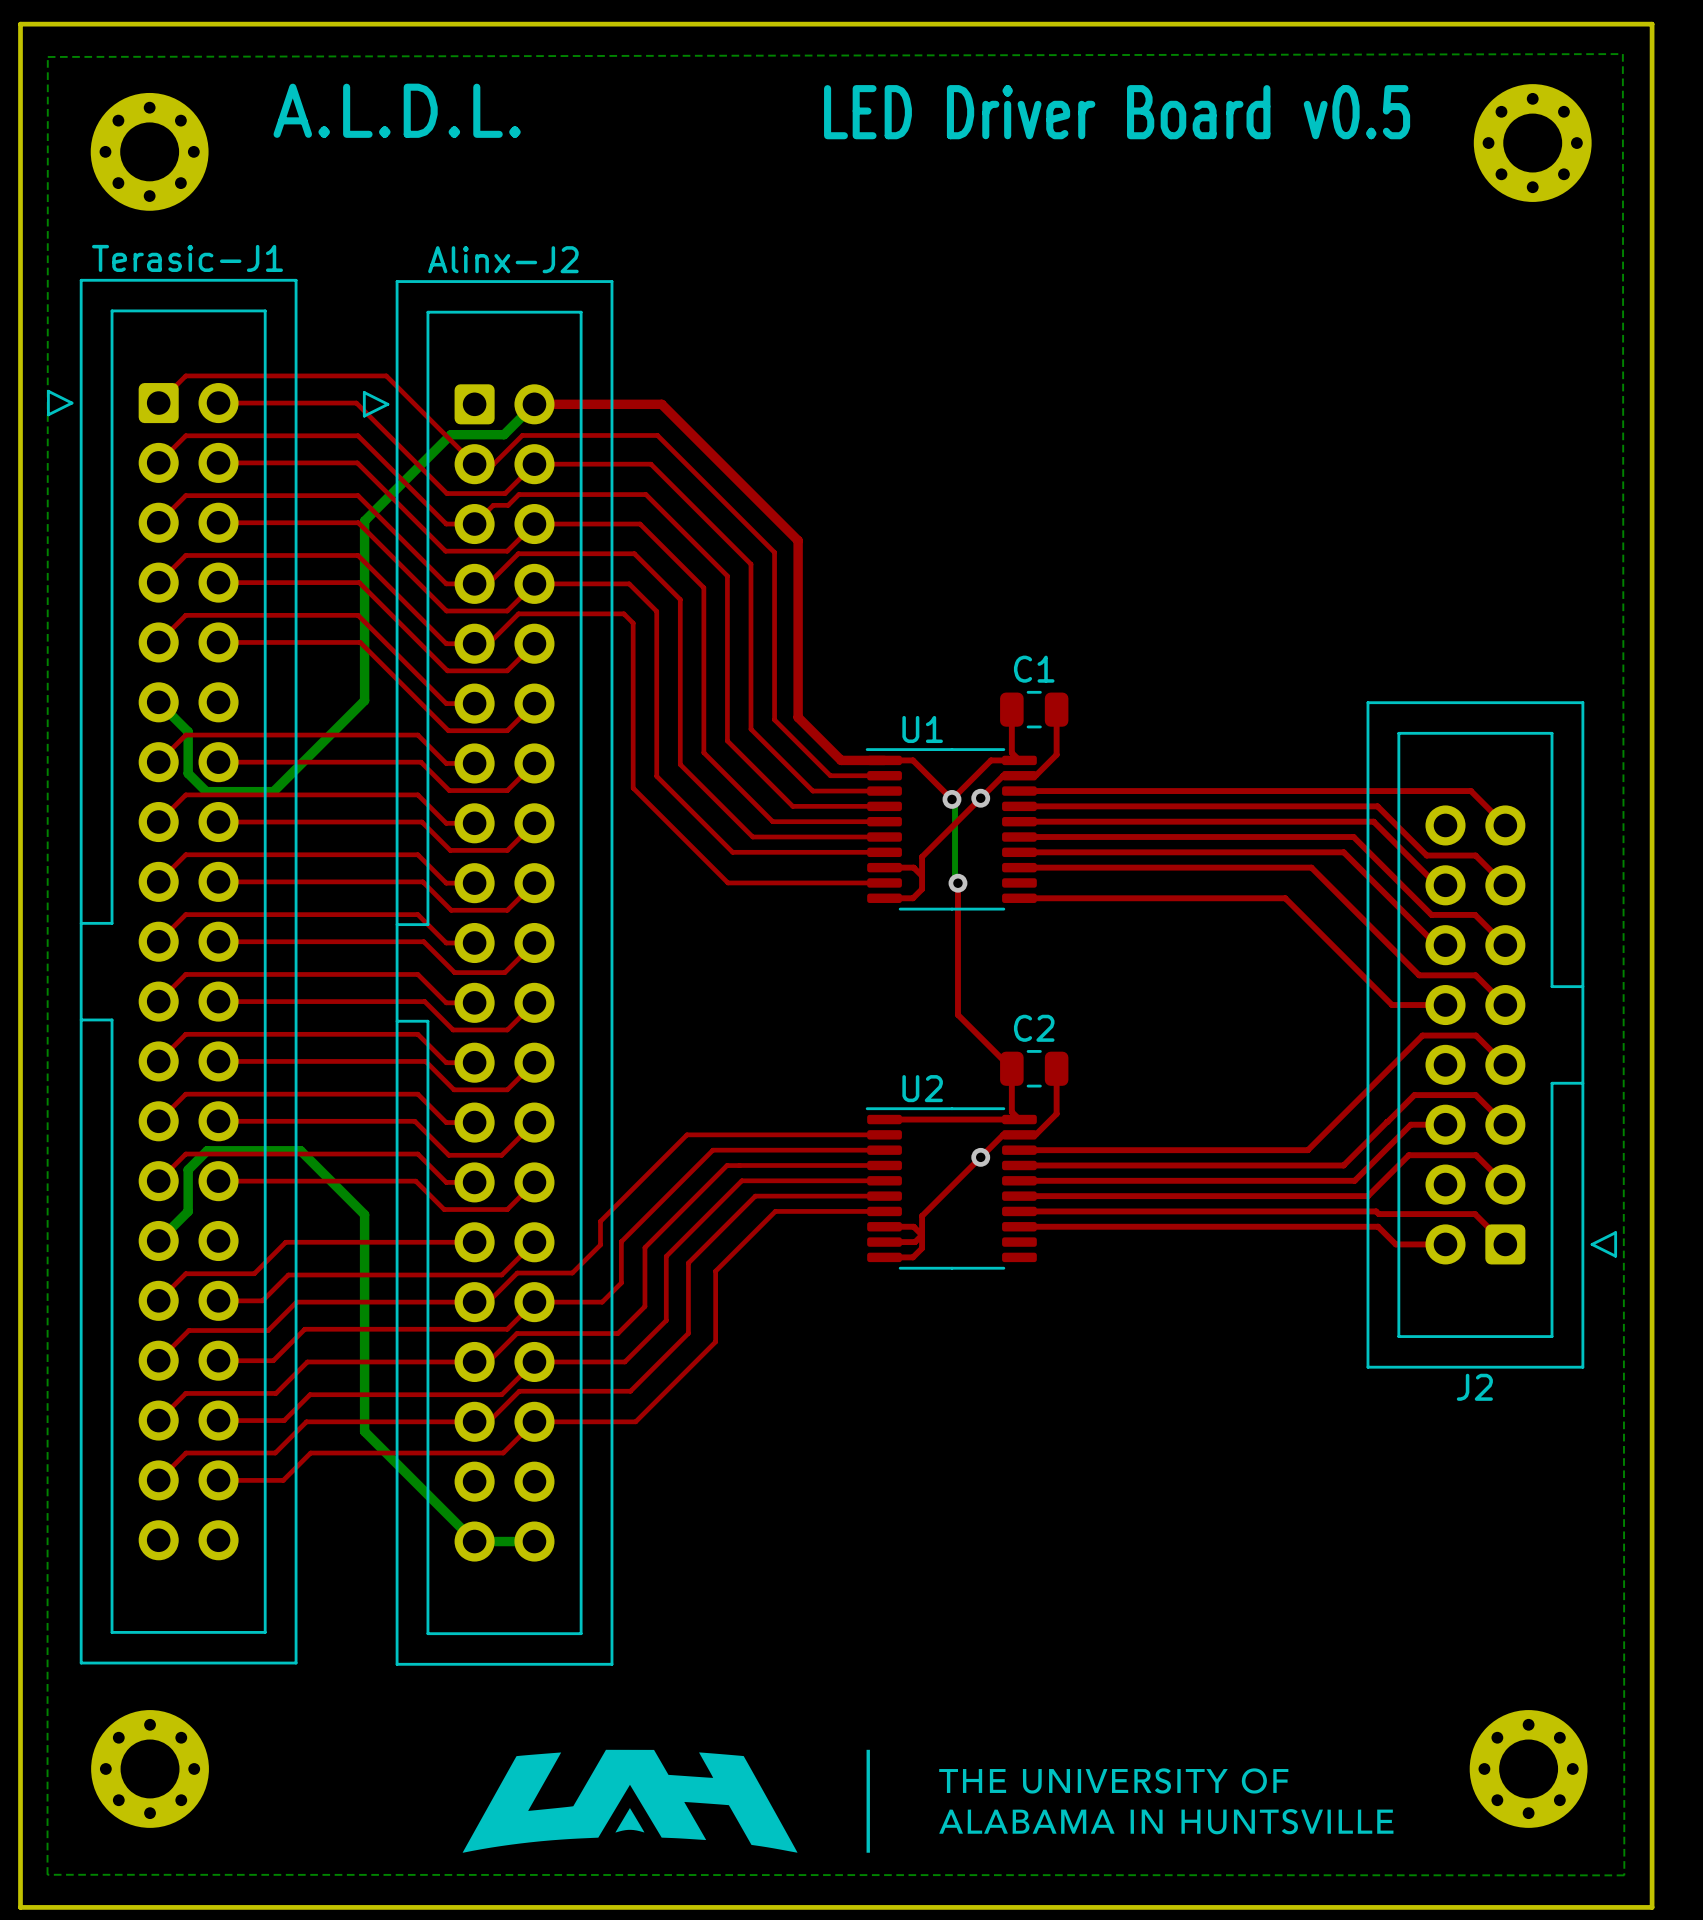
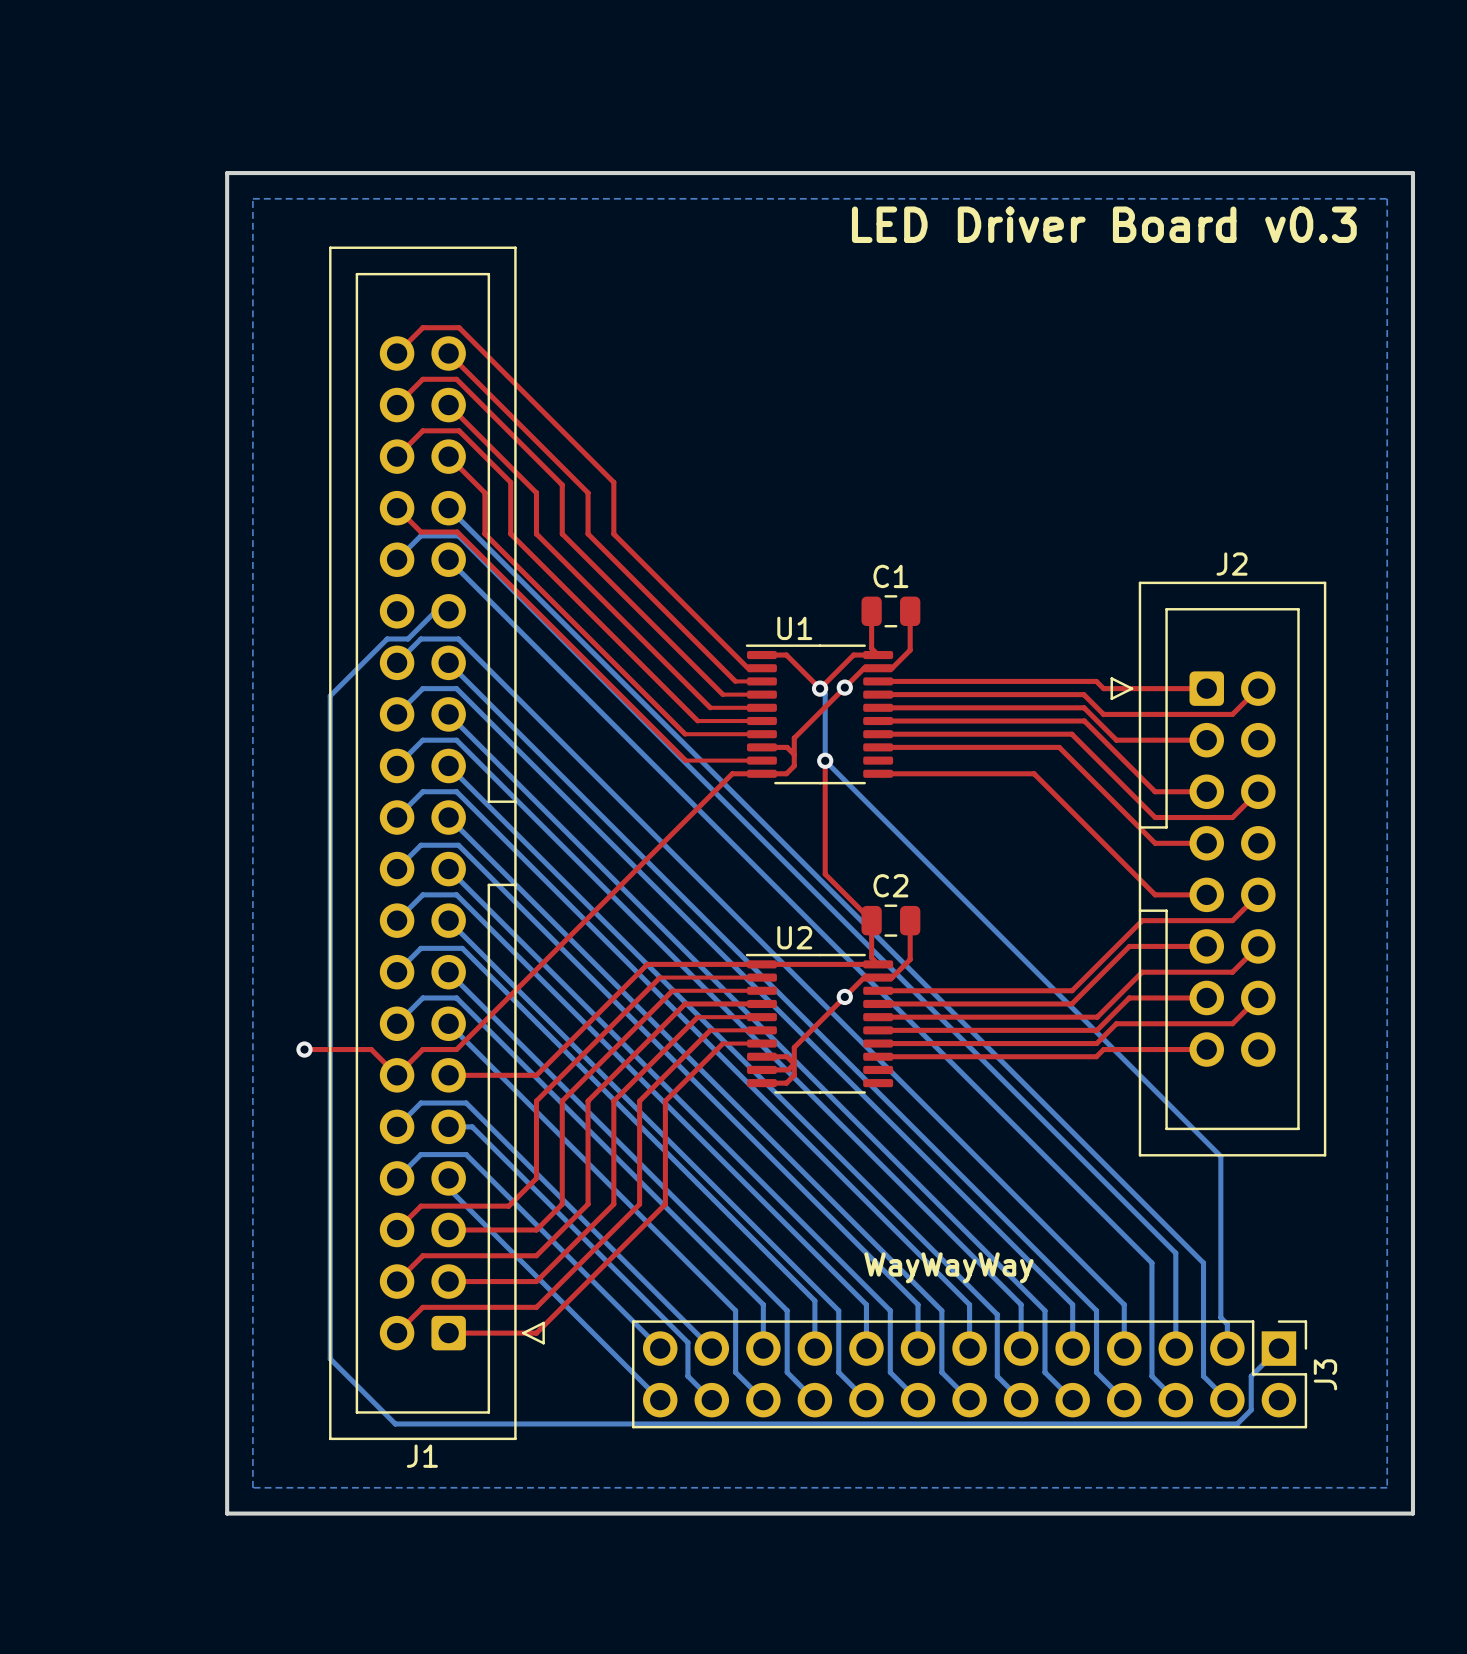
board edge: (20, 24) (1652, 24) (1652, 1907) (20, 1907) (20, 24) -> (227, 173) (227, 1513) (1412, 1513) (1412, 173) (227, 173)
bottom zone outline: (1622, 54) (47, 56) (47, 1874) (1624, 1875) (1622, 54) -> (252, 198) (252, 1487) (1387, 1487) (1387, 198) (252, 198)
text: A.L.D.L. (397, 110) -> none
text: LED Driver Board v0.5 (1117, 112) -> none
part: (1532, 143) -> none
part: (149, 151) -> none
text: none -> LED Driver Board v0.3 (1104, 224)
top track: (158, 403) (185, 375) (386, 375) (474, 464) (493, 464) (522, 435) (657, 435) (774, 552) (774, 719) (830, 775) (868, 775) -> (397, 353) (422, 327) (459, 327) (613, 482) (613, 534) (747, 668)
top track: (218, 403) (356, 403) (446, 493) (505, 493) (534, 464) (650, 464) (750, 564) (750, 729) (812, 791) (853, 791) -> (448, 353) (588, 492) (588, 533) (735, 681)
top track: (534, 404) (661, 404) (798, 540) (798, 717) (841, 760) (884, 760) -> none
bottom track: (534, 404) (504, 434) (450, 434) (364, 521) (364, 700) (273, 791) (206, 791) (188, 773) (188, 731) (158, 702) -> none
top track: (158, 462) (185, 435) (358, 435) (446, 524) (474, 524) (493, 505) (508, 505) (518, 494) (645, 494) (727, 576) (727, 740) (792, 806) (839, 806) -> (397, 405) (422, 379) (456, 379) (562, 484) (562, 533) (722, 694)
top track: (218, 462) (357, 462) (445, 551) (507, 551) (534, 524) (640, 524) (703, 587) (703, 752) (772, 821) (824, 821) -> (448, 405) (536, 492) (536, 533) (710, 707)
top track: (158, 522) (185, 495) (358, 495) (446, 583) (488, 583) (518, 553) (634, 553) (680, 599) (680, 764) (752, 837) (810, 837) -> (397, 456) (422, 430) (459, 430) (510, 482) (510, 533) (697, 721)
top track: (218, 522) (358, 522) (446, 611) (507, 611) (534, 583) (629, 583) (656, 611) (656, 776) (732, 852) (795, 852) -> (448, 456) (484, 492) (484, 533) (685, 734)
top track: (158, 582) (185, 555) (358, 555) (446, 643) (488, 643) (518, 613) (623, 613) (633, 623) (633, 788) (728, 882) (796, 882) -> (397, 508) (420, 532) (457, 532) (685, 760)
top track: (218, 582) (359, 582) (447, 670) (507, 670) (534, 643) -> none
bottom track: none -> (448, 508) (1203, 1263) (1203, 1376) (1227, 1400)
top track: (158, 642) (185, 615) (358, 615) (446, 703) (474, 703) -> none
top track: (218, 642) (360, 642) (448, 730) (507, 730) (534, 703) -> none
bottom track: none -> (397, 559) (420, 535) (458, 535) (1175, 1253) (1175, 1348)
bottom track: none -> (448, 559) (1151, 1263) (1151, 1376) (1175, 1400)
J2 footprint: [1366, 701, 1618, 1369] -> [1110, 581, 1327, 1157]
bottom track: none -> (448, 611) (435, 611) (408, 639) (387, 639) (330, 695) (330, 1358) (395, 1423) (1237, 1423) (1251, 1410) (1251, 1376) (1278, 1348)
top track: (158, 762) (185, 735) (417, 735) (446, 763) (474, 763) -> none
top track: (218, 762) (420, 762) (449, 790) (507, 790) (534, 763) -> none
bottom track: none -> (397, 662) (420, 639) (458, 639) (1124, 1304) (1124, 1348)
bottom track: none -> (448, 662) (1096, 1310) (1096, 1372) (1124, 1400)
top track: (1272, 791) (1470, 791) (1505, 825) -> (1096, 681) (1103, 688) (1206, 688)
bottom track: (955, 802) (955, 880) (957, 883) -> (822, 691) (825, 693) (825, 760) (1220, 1156) (1220, 1317) (1227, 1324) (1227, 1348)
top track: (1258, 806) (1377, 806) (1426, 855) (1475, 855) (1505, 885) -> (1083, 694) (1103, 714) (1232, 714) (1258, 688)
top track: (1258, 821) (1373, 821) (1437, 885) (1445, 885) -> (1084, 707) (1116, 740) (1206, 740)
top track: (158, 822) (185, 794) (417, 794) (446, 823) (474, 823) -> none
top track: (218, 822) (421, 822) (450, 850) (507, 850) (534, 823) -> none
bottom track: none -> (397, 714) (422, 688) (456, 688) (1072, 1304) (1072, 1348)
bottom track: none -> (448, 714) (1044, 1310) (1044, 1372) (1072, 1400)
top track: (1258, 837) (1353, 837) (1431, 914) (1475, 914) (1505, 945) -> (1084, 721) (1155, 791) (1206, 791)
top track: (1244, 852) (1343, 852) (1436, 945) (1445, 945) -> (1071, 734) (1155, 817) (1232, 817) (1258, 791)
top track: (1229, 867) (1311, 867) (1419, 975) (1475, 975) (1505, 1005) -> (1059, 747) (1155, 843) (1206, 843)
top track: (158, 881) (185, 854) (417, 854) (446, 883) (474, 883) -> none
top track: (218, 881) (422, 881) (451, 910) (507, 910) (534, 883) -> none
bottom track: none -> (397, 765) (422, 740) (456, 740) (1021, 1304) (1021, 1348)
bottom track: none -> (448, 765) (997, 1314) (997, 1376) (1021, 1400)
top track: none -> (761, 773) (732, 773) (456, 1049) (422, 1049) (397, 1075) (371, 1049) (304, 1049)
top track: (1200, 898) (1285, 898) (1392, 1005) (1445, 1005) -> (1034, 773) (1155, 894) (1206, 894)
top track: (158, 941) (185, 914) (417, 914) (446, 943) (474, 943) -> none
top track: (218, 941) (423, 941) (454, 972) (504, 972) (534, 943) -> none
bottom track: none -> (397, 817) (422, 791) (456, 791) (969, 1304) (969, 1348)
bottom track: none -> (448, 817) (941, 1310) (941, 1372) (969, 1400)
Terasic-J1: (172, 971) -> none
Alinx-J2: (488, 972) -> none
J1: none -> (436, 843)
top track: (158, 1001) (185, 974) (417, 974) (446, 1002) (474, 1002) -> none
top track: (218, 1001) (424, 1001) (453, 1029) (507, 1029) (534, 1002) -> none
bottom track: none -> (397, 869) (420, 845) (458, 845) (918, 1304) (918, 1348)
bottom track: none -> (448, 869) (890, 1310) (890, 1372) (918, 1400)
top track: (158, 1061) (185, 1034) (417, 1034) (446, 1062) (474, 1062) -> none
top track: (218, 1061) (425, 1061) (454, 1089) (507, 1089) (534, 1062) -> none
top track: (1505, 1064) (1476, 1035) (1422, 1035) (1307, 1150) (1244, 1150) -> (1258, 894) (1232, 920) (1142, 920) (1072, 990)
bottom track: none -> (397, 920) (422, 894) (456, 894) (866, 1304) (866, 1348)
bottom track: none -> (448, 920) (838, 1310) (838, 1372) (866, 1400)
top track: none -> (761, 964) (647, 964) (536, 1075) (448, 1075)
top track: (158, 1121) (185, 1094) (417, 1094) (446, 1122) (474, 1122) -> none
top track: (218, 1121) (414, 1121) (448, 1155) (501, 1155) (534, 1122) -> none
top track: (1387, 1121) (1343, 1165) (1244, 1165) -> (1206, 946) (1129, 946) (1071, 1003)
top track: (1387, 1121) (1414, 1095) (1475, 1095) (1505, 1124) -> none
top track: (1445, 1124) (1410, 1124) (1354, 1180) (1273, 1180) -> (1258, 946) (1232, 972) (1142, 972) (1097, 1017)
bottom track: none -> (397, 972) (420, 948) (462, 948) (814, 1300) (814, 1348)
bottom track: none -> (448, 972) (787, 1310) (787, 1372) (814, 1400)
top track: (766, 1134) (687, 1134) (600, 1221) (600, 1244) (572, 1273) (517, 1273) (488, 1302) (296, 1302) (268, 1330) (188, 1330) (158, 1360) -> (660, 977) (536, 1101) (536, 1178) (508, 1206) (420, 1206) (397, 1229)
top track: (780, 1150) (712, 1150) (621, 1241) (621, 1282) (602, 1302) (534, 1302) (507, 1329) (304, 1329) (273, 1360) (218, 1360) -> (672, 990) (562, 1101) (562, 1204) (536, 1229) (448, 1229)
top track: (884, 1165) (727, 1165) (644, 1247) (644, 1306) (617, 1333) (516, 1333) (488, 1361) (307, 1361) (275, 1393) (185, 1393) (158, 1420) -> (761, 1003) (685, 1003) (588, 1101) (588, 1204) (536, 1255) (422, 1255) (397, 1281)
top track: (810, 1180) (741, 1180) (666, 1256) (666, 1320) (624, 1361) (534, 1361) (501, 1394) (310, 1394) (284, 1420) (218, 1420) -> (697, 1017) (613, 1101) (613, 1204) (536, 1281) (448, 1281)
top track: (158, 1181) (185, 1154) (417, 1154) (446, 1182) (474, 1182) -> none
top track: (218, 1181) (415, 1181) (444, 1209) (507, 1209) (534, 1182) -> none
top track: (1505, 1184) (1475, 1155) (1408, 1155) (1368, 1196) (1273, 1196) -> (1206, 997) (1129, 997) (1096, 1030)
bottom track: none -> (397, 1023) (422, 997) (456, 997) (763, 1304) (763, 1348)
bottom track: none -> (448, 1023) (735, 1310) (735, 1372) (763, 1400)
top track: (824, 1196) (755, 1196) (688, 1263) (688, 1333) (630, 1391) (519, 1391) (488, 1421) (306, 1421) (275, 1453) (186, 1453) (158, 1480) -> (710, 1030) (639, 1101) (639, 1204) (536, 1307) (422, 1307) (397, 1333)
top track: (839, 1211) (775, 1211) (715, 1271) (715, 1341) (635, 1421) (534, 1421) (503, 1453) (310, 1453) (283, 1480) (218, 1480) -> (722, 1043) (665, 1101) (665, 1204) (536, 1333) (448, 1333)
top track: (1273, 1211) (1474, 1214) (1505, 1244) -> (1096, 1043) (1116, 1023) (1232, 1023) (1258, 997)
via: none -> (304, 1049)
top track: (1272, 1226) (1378, 1226) (1395, 1244) (1445, 1244) -> (1096, 1056) (1103, 1049) (1206, 1049)
bottom track: (158, 1241) (188, 1211) (188, 1169) (207, 1150) (300, 1150) (364, 1214) (364, 1431) (474, 1541) (534, 1541) -> none
top track: (474, 1242) (285, 1242) (254, 1273) (185, 1273) (158, 1300) -> none
top track: (534, 1242) (501, 1275) (288, 1275) (262, 1300) (218, 1300) -> none
bottom track: none -> (397, 1126) (420, 1103) (466, 1103) (711, 1348)
bottom track: none -> (448, 1126) (472, 1126) (687, 1342) (687, 1376) (711, 1400)
bottom track: none -> (397, 1178) (420, 1154) (466, 1154) (660, 1348)
bottom track: none -> (448, 1178) (448, 1188) (660, 1400)
J2 name position: J2 (1474, 1387) -> J2 (1232, 564)
text: none -> WayWayWay (948, 1267)
J3: none -> (969, 1374)
drawing: [462, 1749, 1394, 1853] -> none
part: (150, 1768) -> none
part: (1528, 1768) -> none

